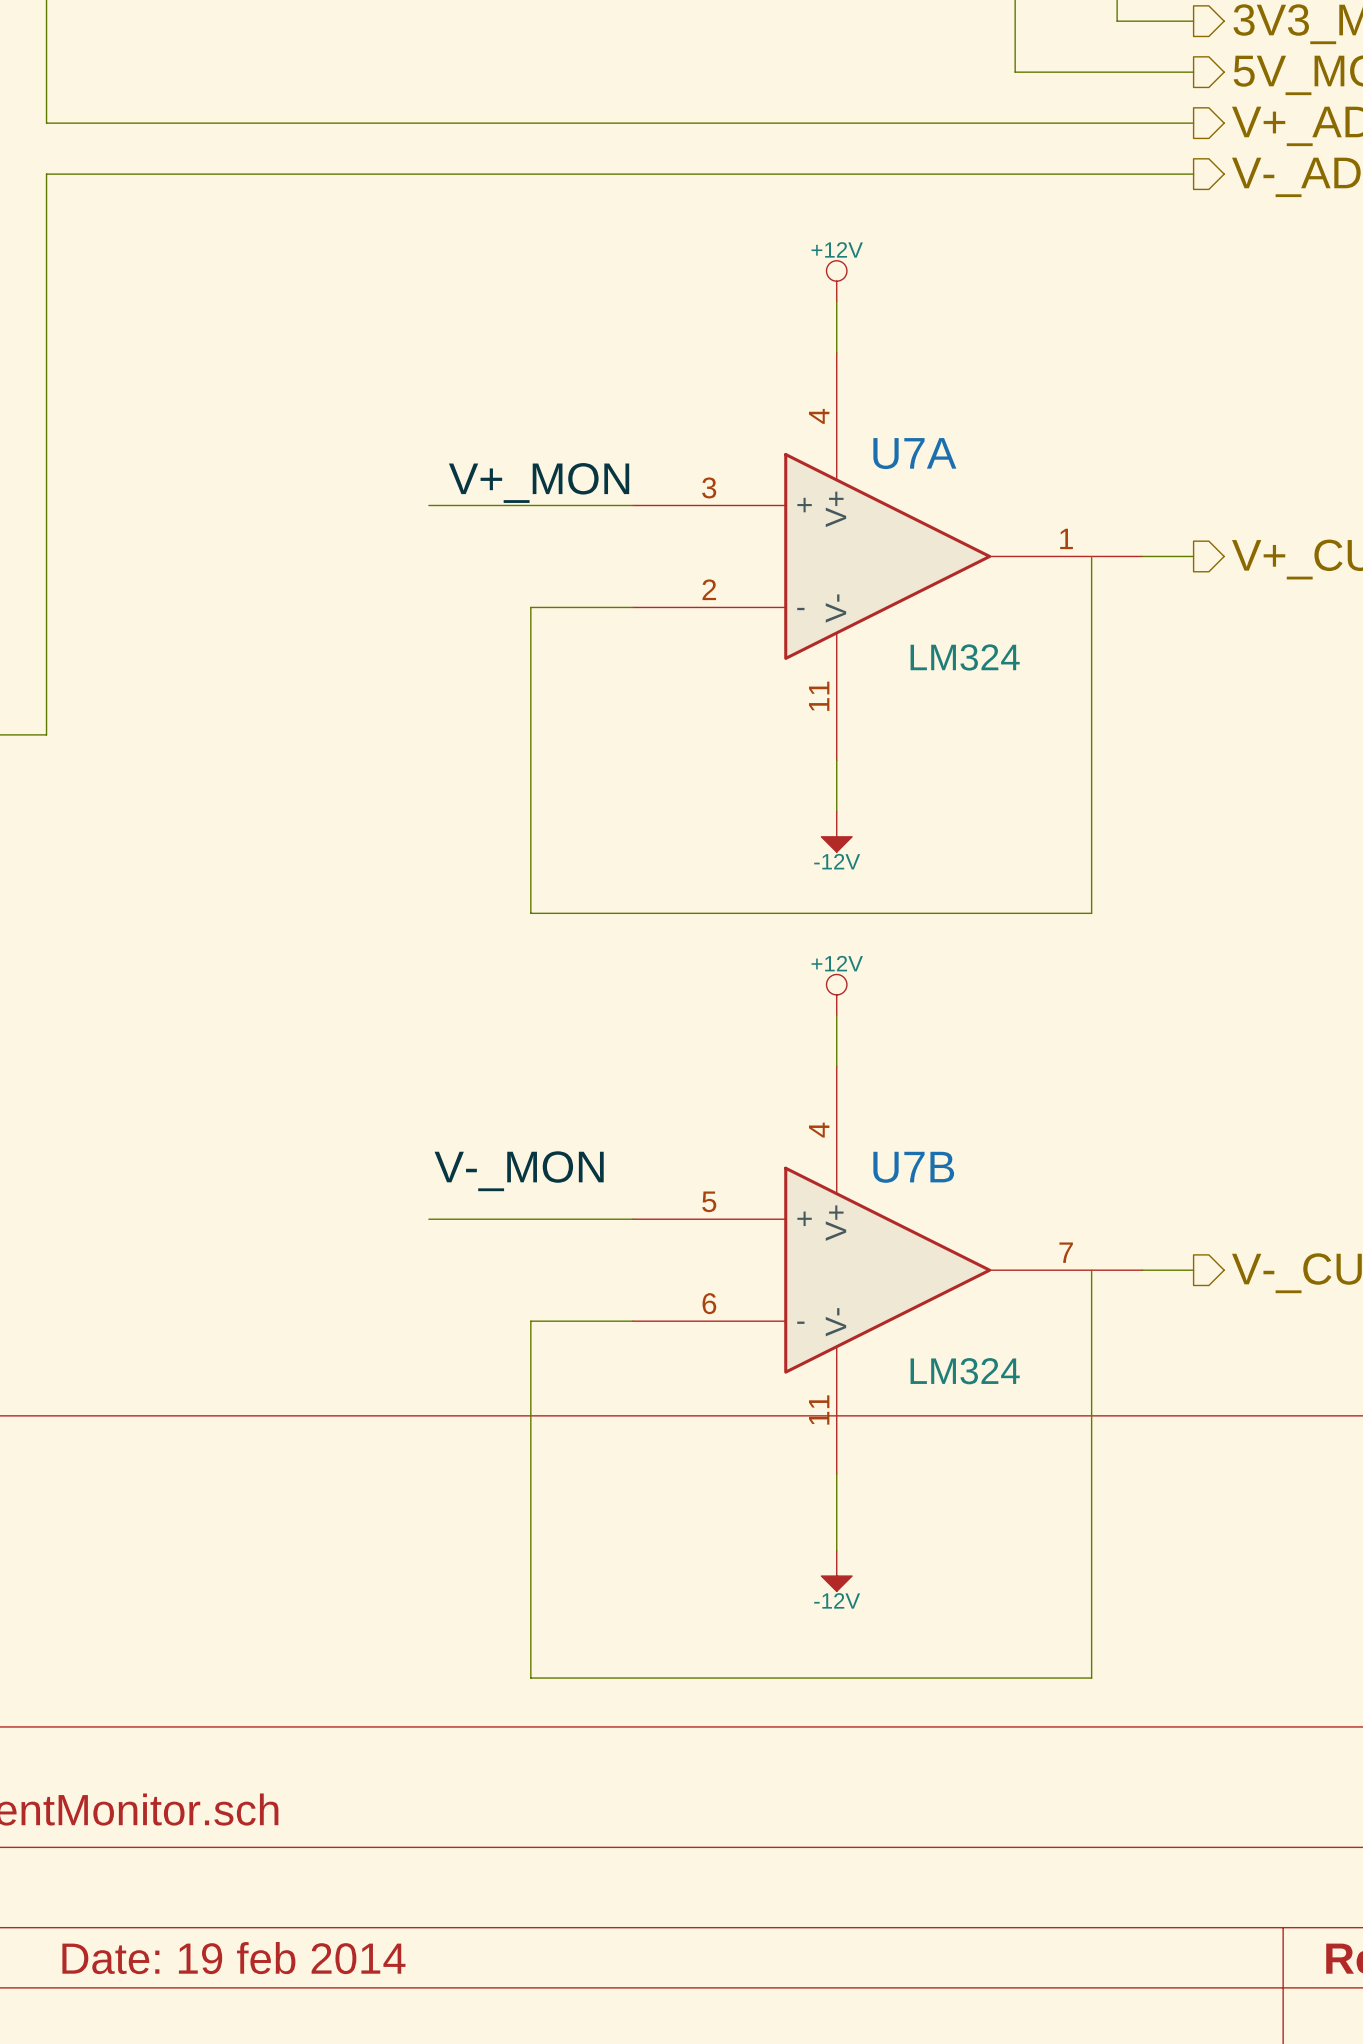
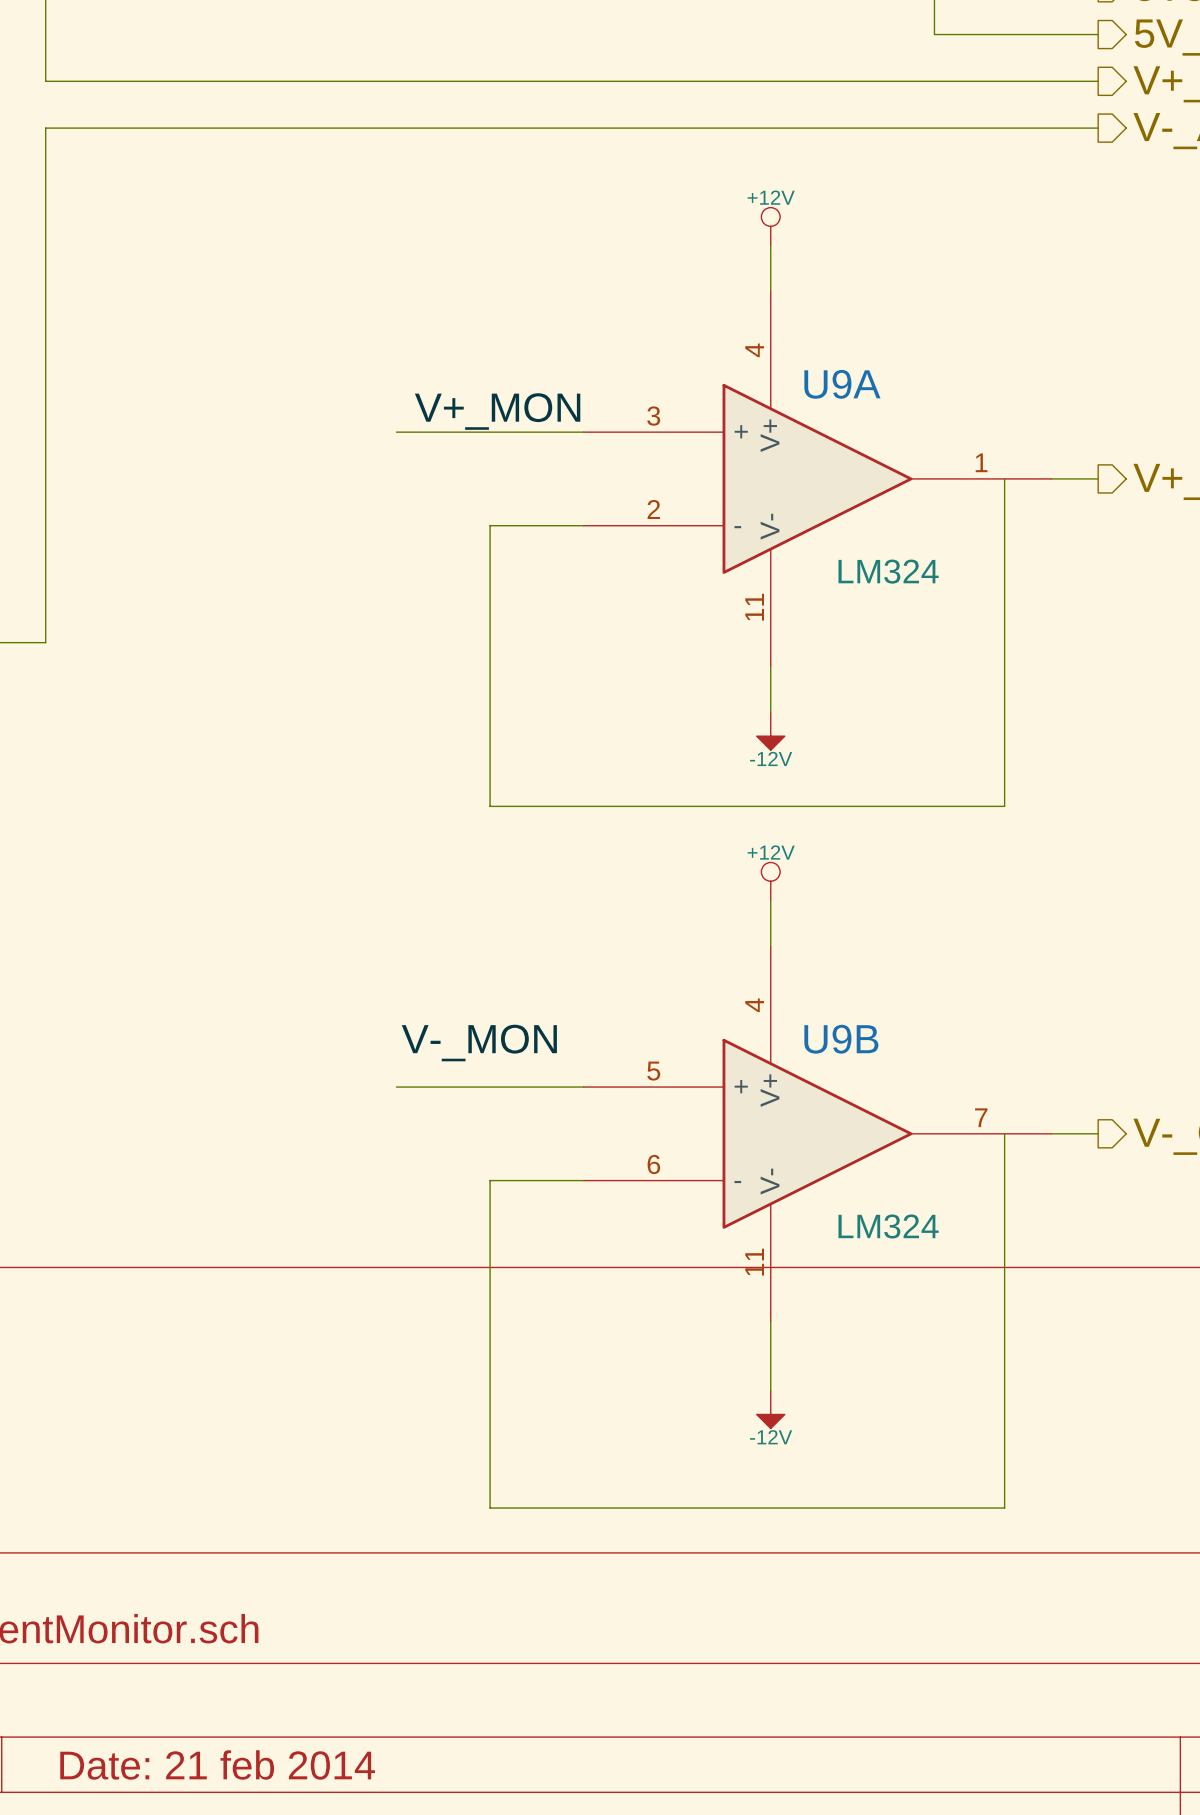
U7A name: U7A (914, 453) -> U9A (842, 384)
U7B name: U7B (913, 1167) -> U9B (841, 1039)
title block: Date: 19 feb 2014 (233, 1958) -> Date: 21 feb 2014 (217, 1764)

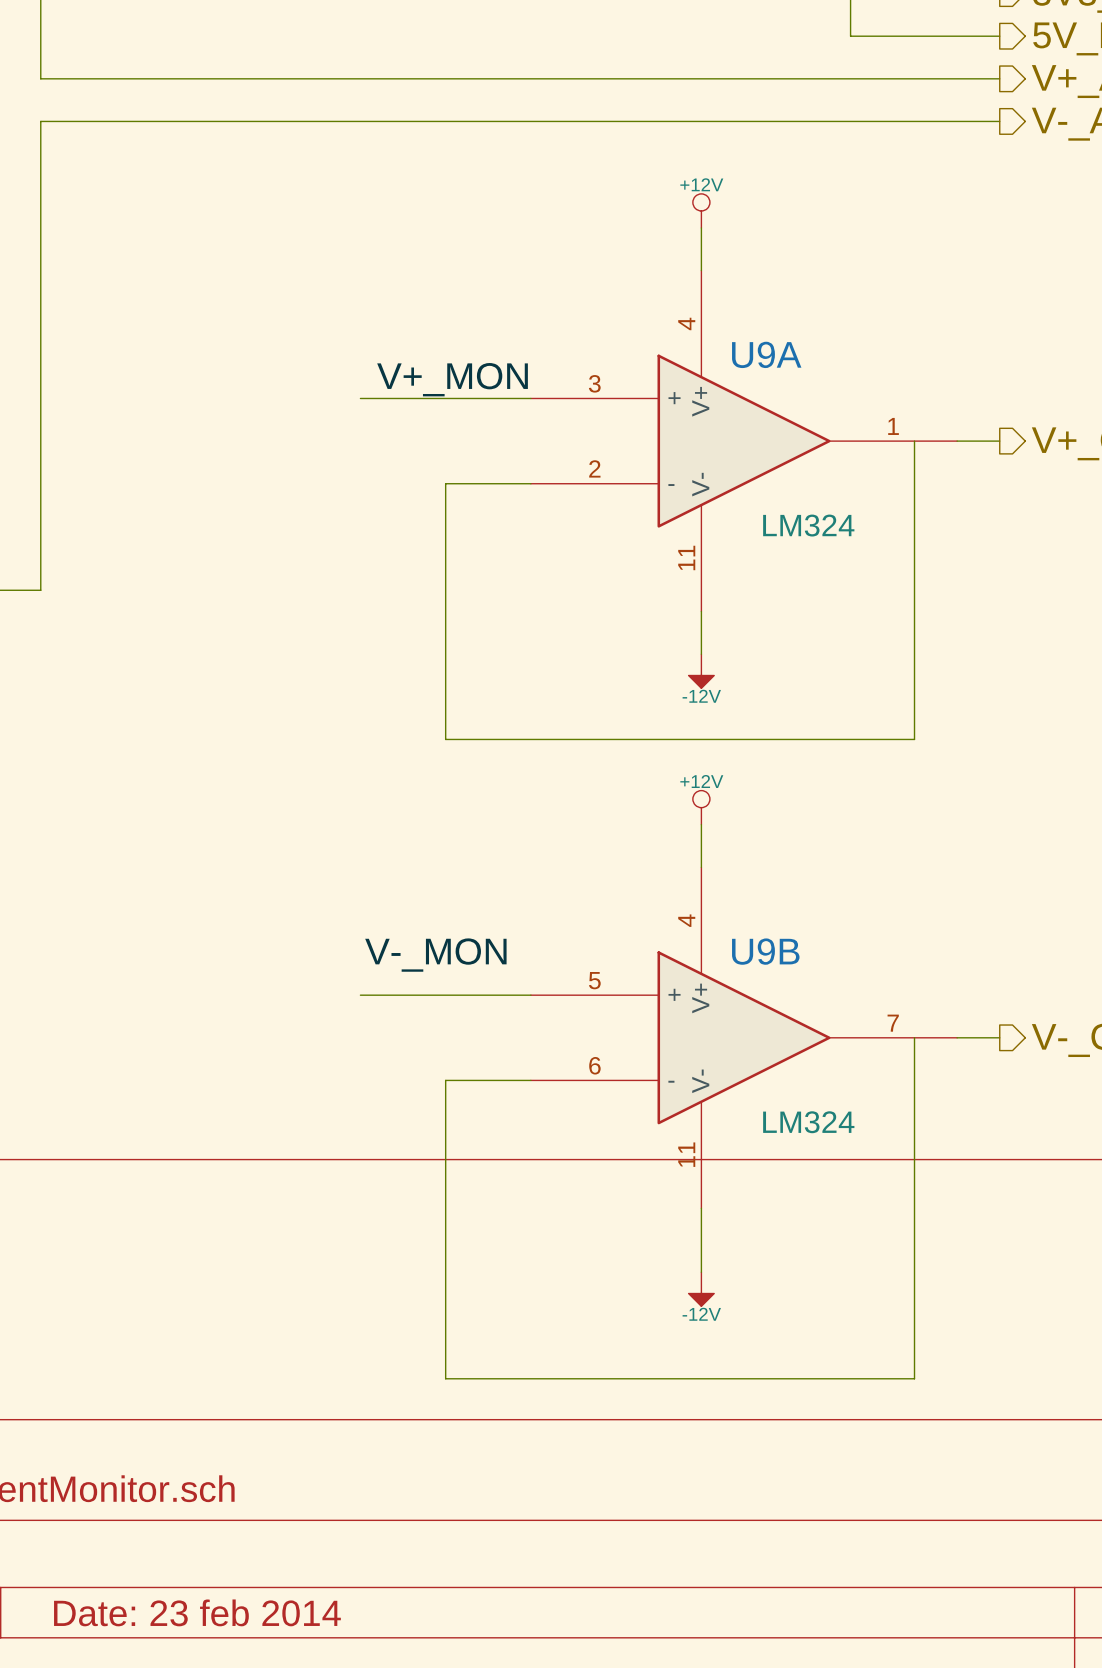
title block: Date: 21 feb 2014 (217, 1764) -> Date: 23 feb 2014 (197, 1612)

